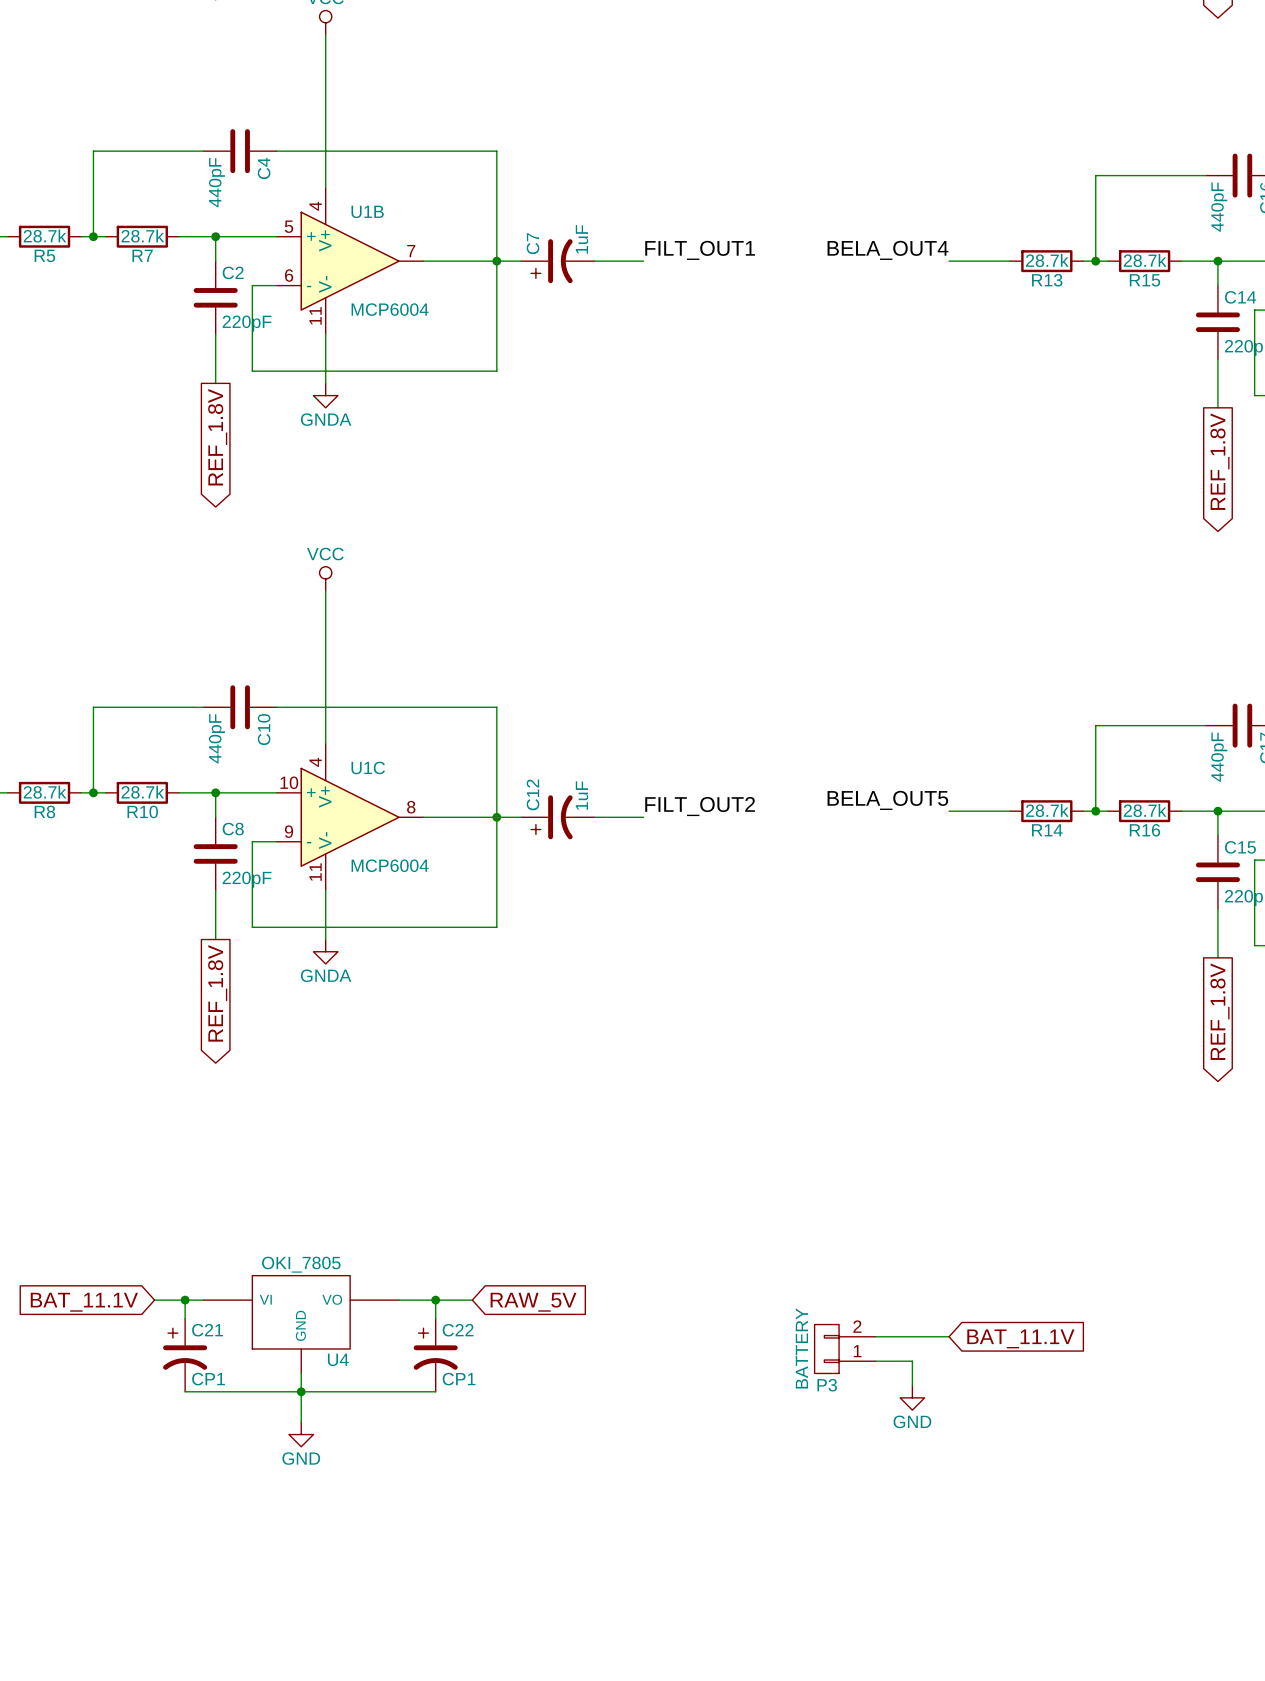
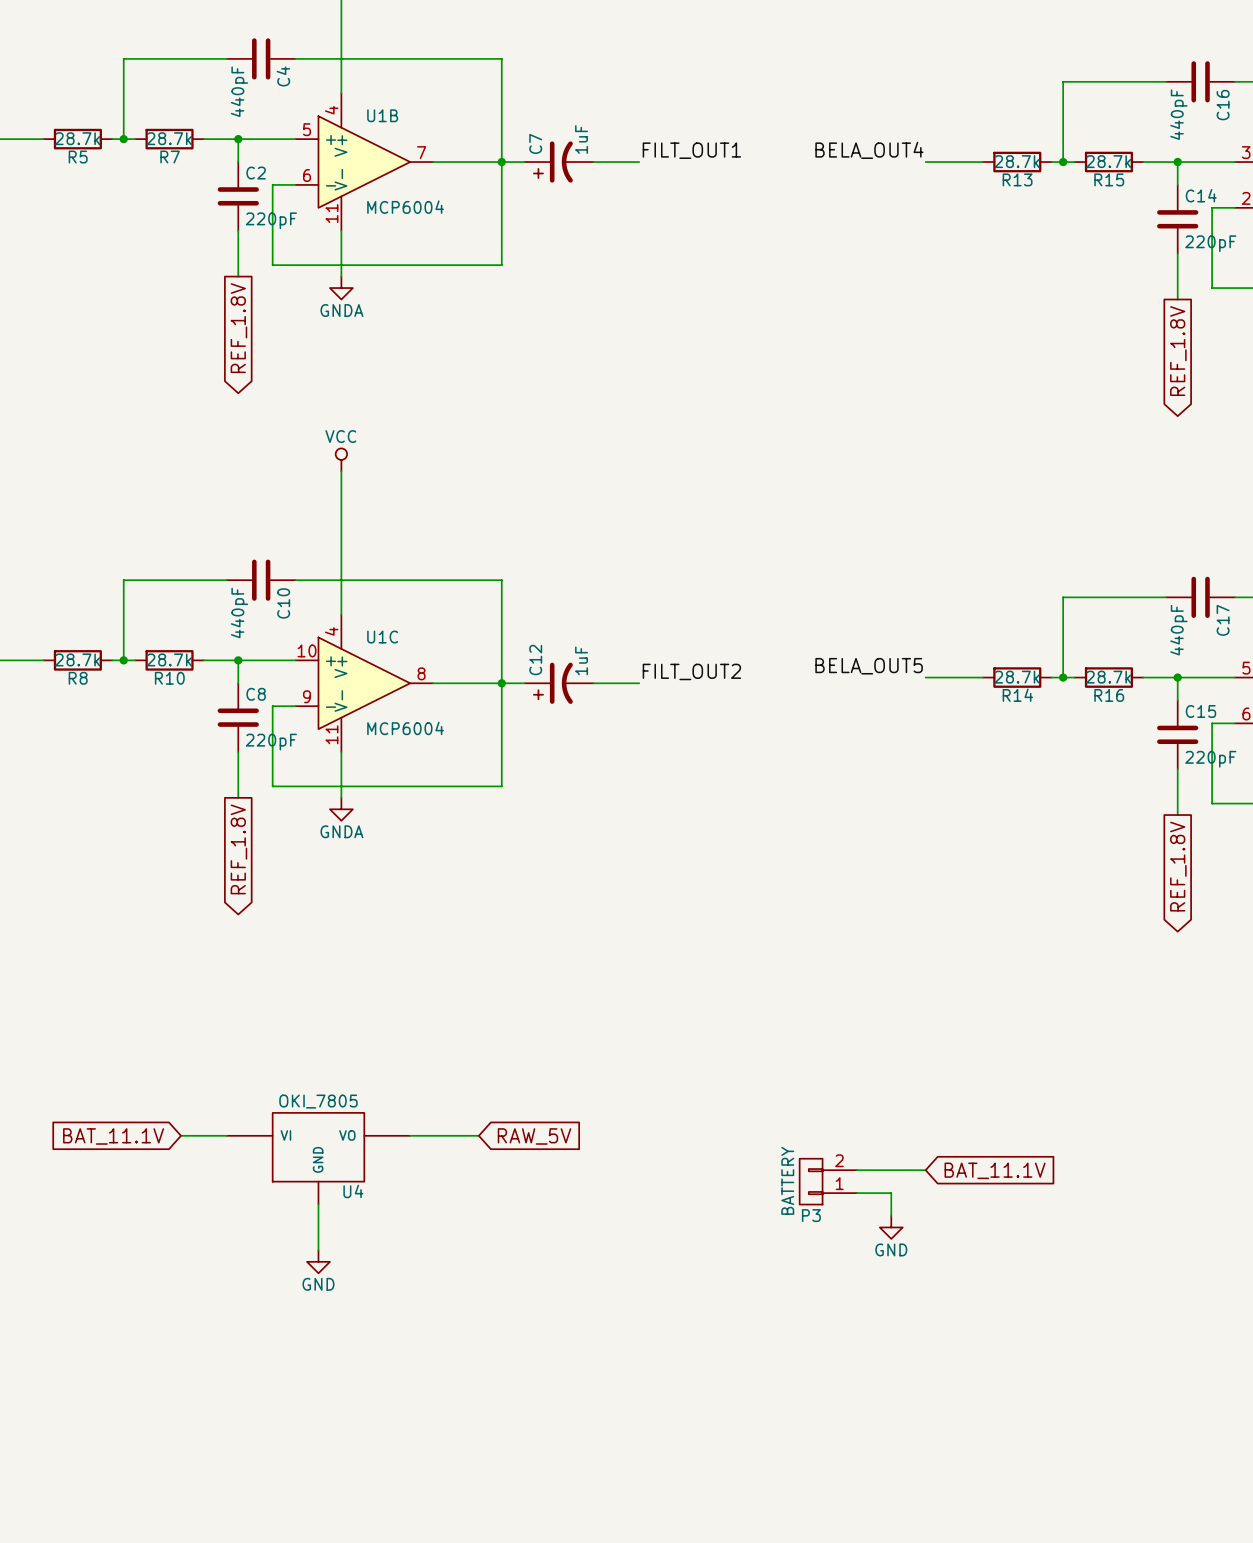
wire: (185, 1300) (185, 1318) -> none
junction: (185, 1300) -> none
wire: (435, 1300) (435, 1318) -> none
junction: (435, 1300) -> none
C21: CP1 (185, 1355) -> none
C22: CP1 (435, 1355) -> none
wire: (185, 1391) (435, 1391) -> none
junction: (301, 1391) -> none

